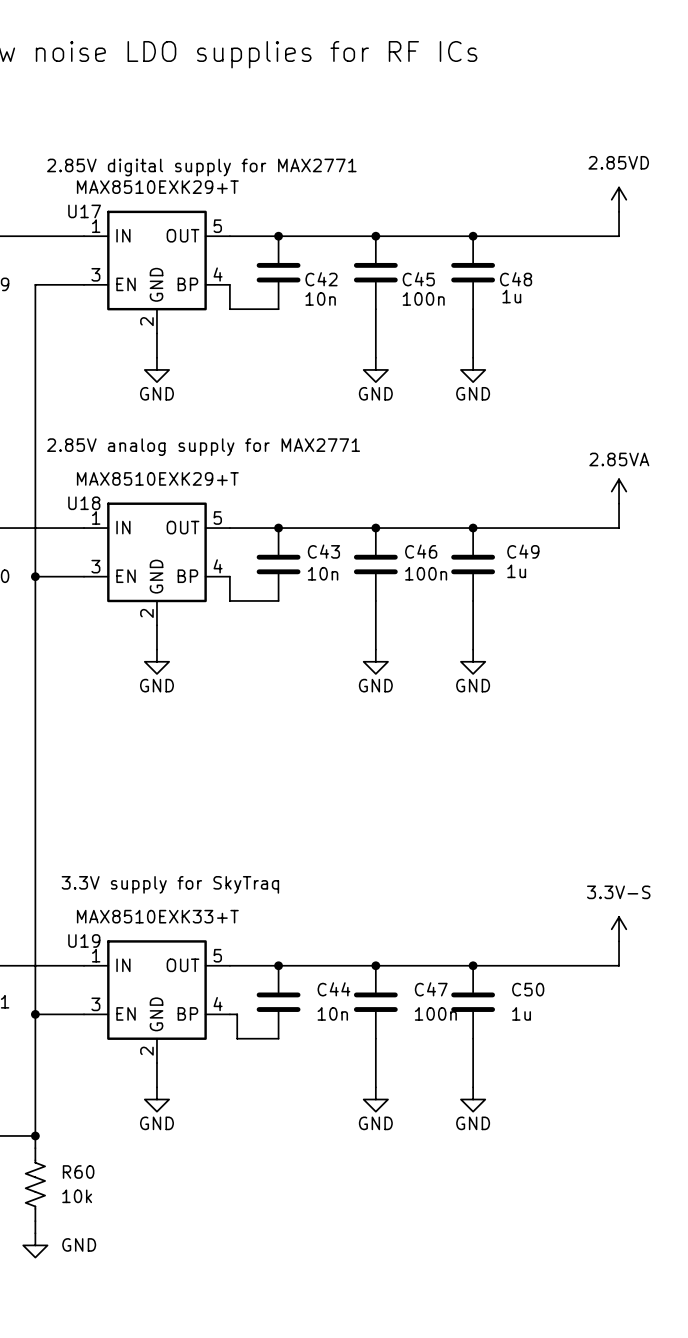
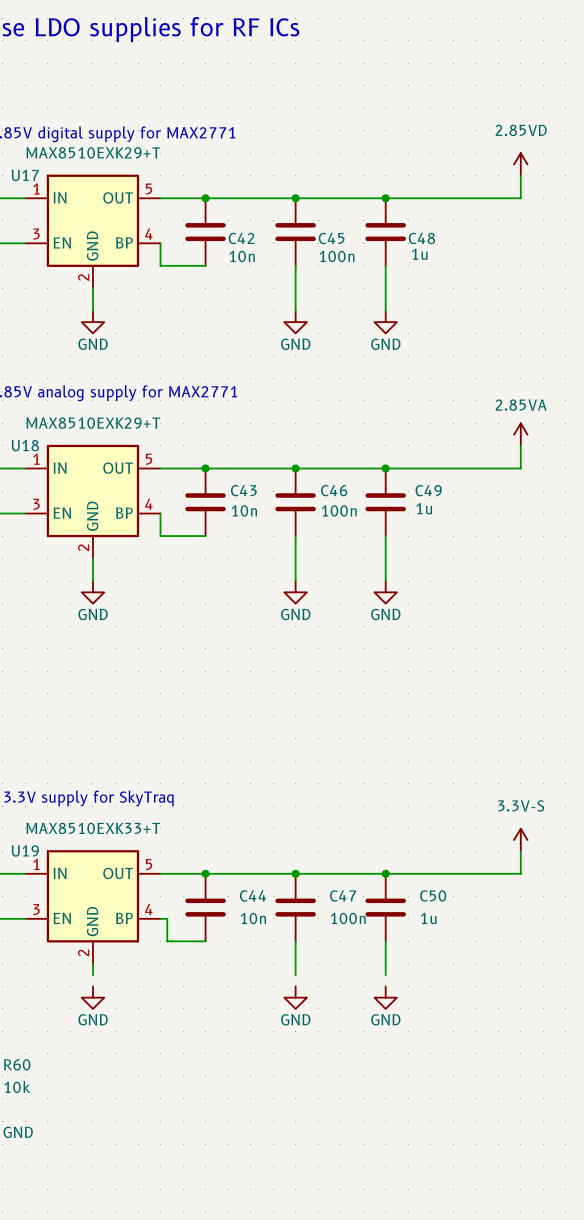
wire: (156, 1075) (156, 1087) -> none
wire: (375, 1075) (375, 1087) -> none
wire: (473, 1075) (473, 1087) -> none

